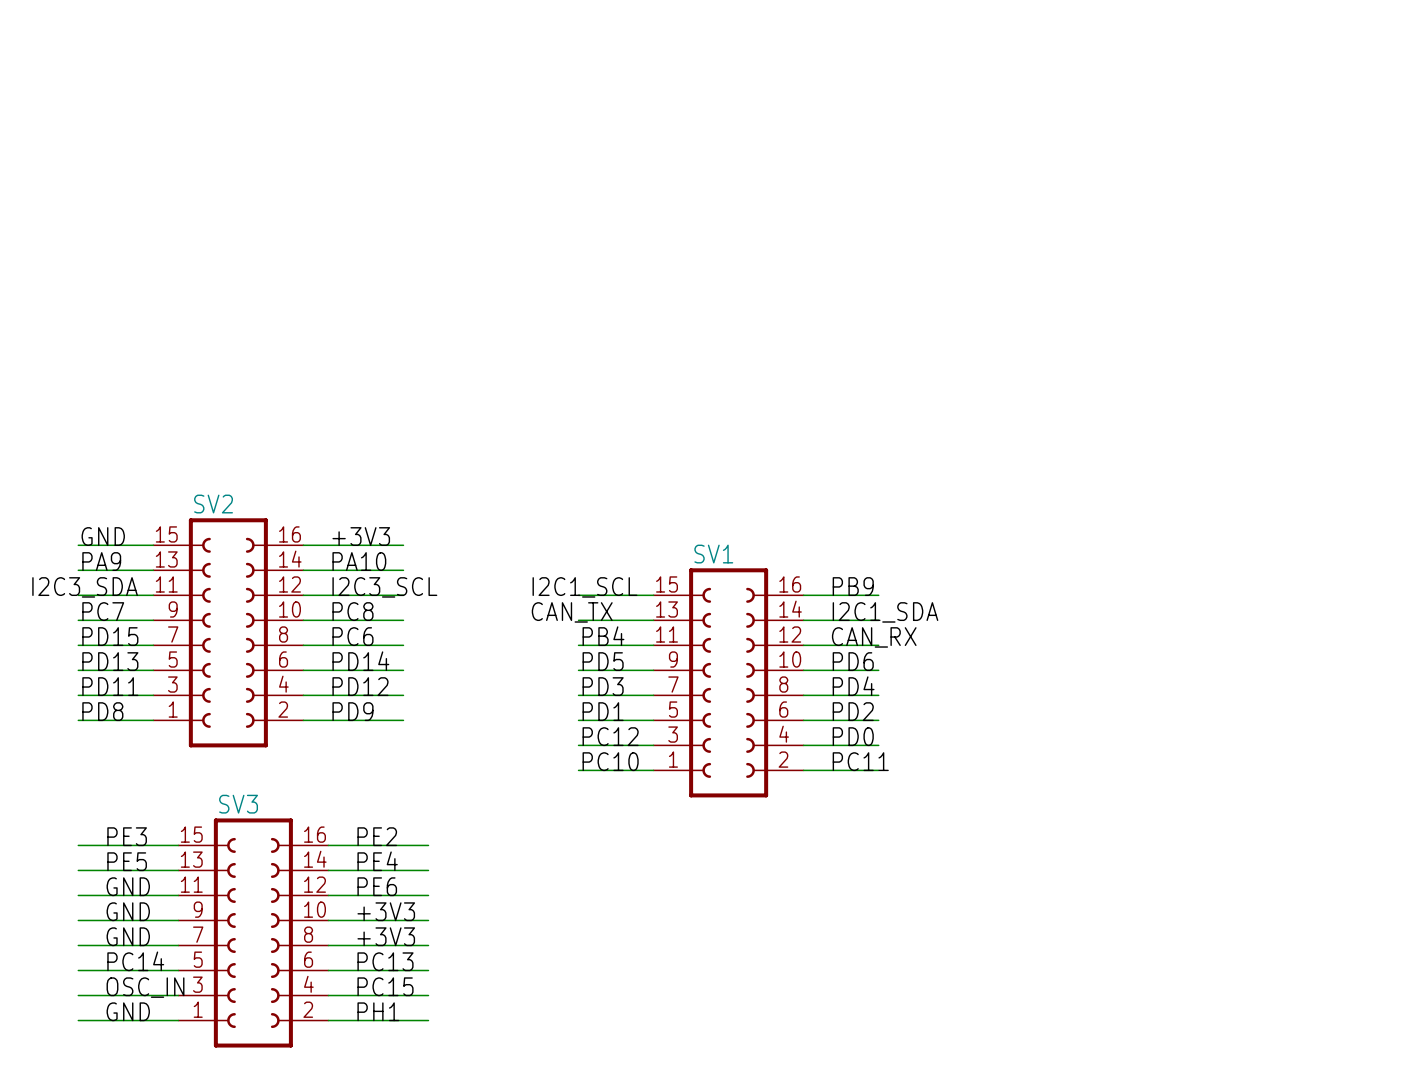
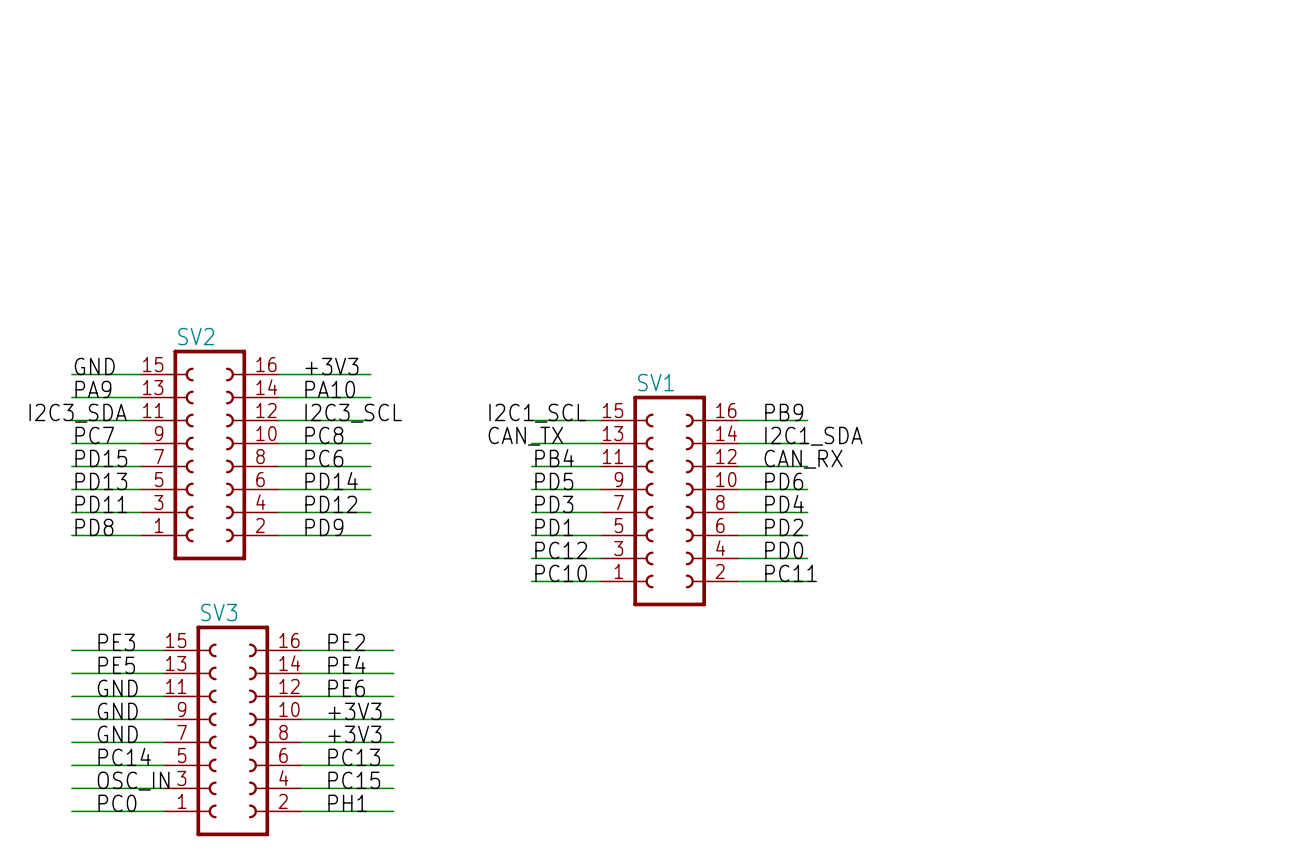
label: GND (128, 1011) -> PC0 (117, 803)

